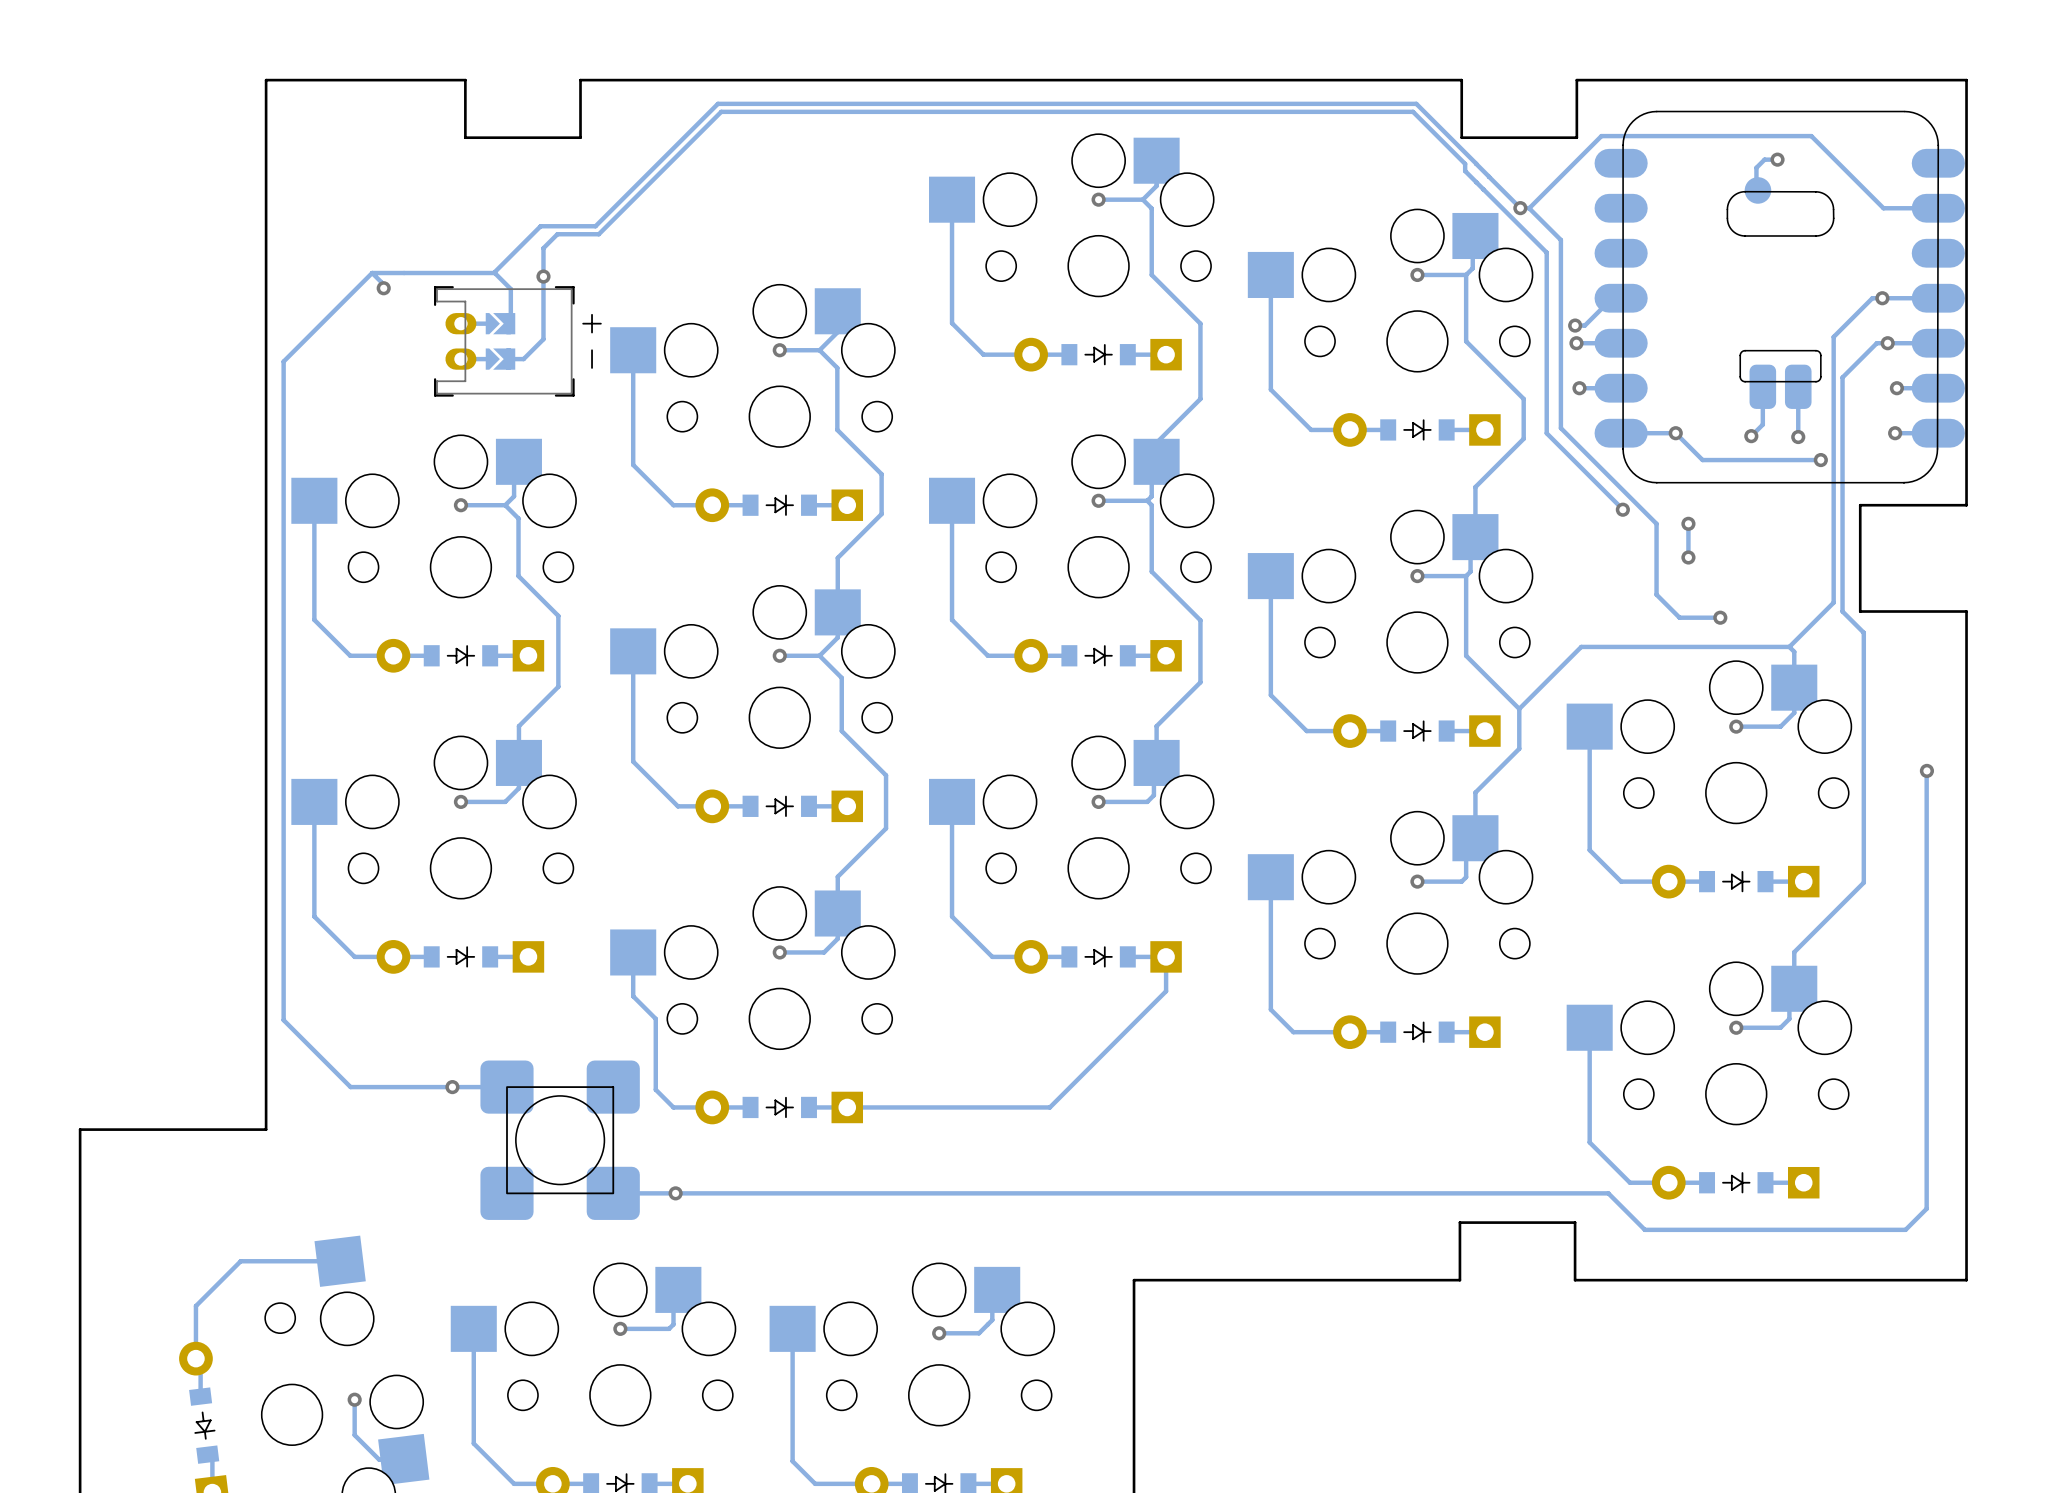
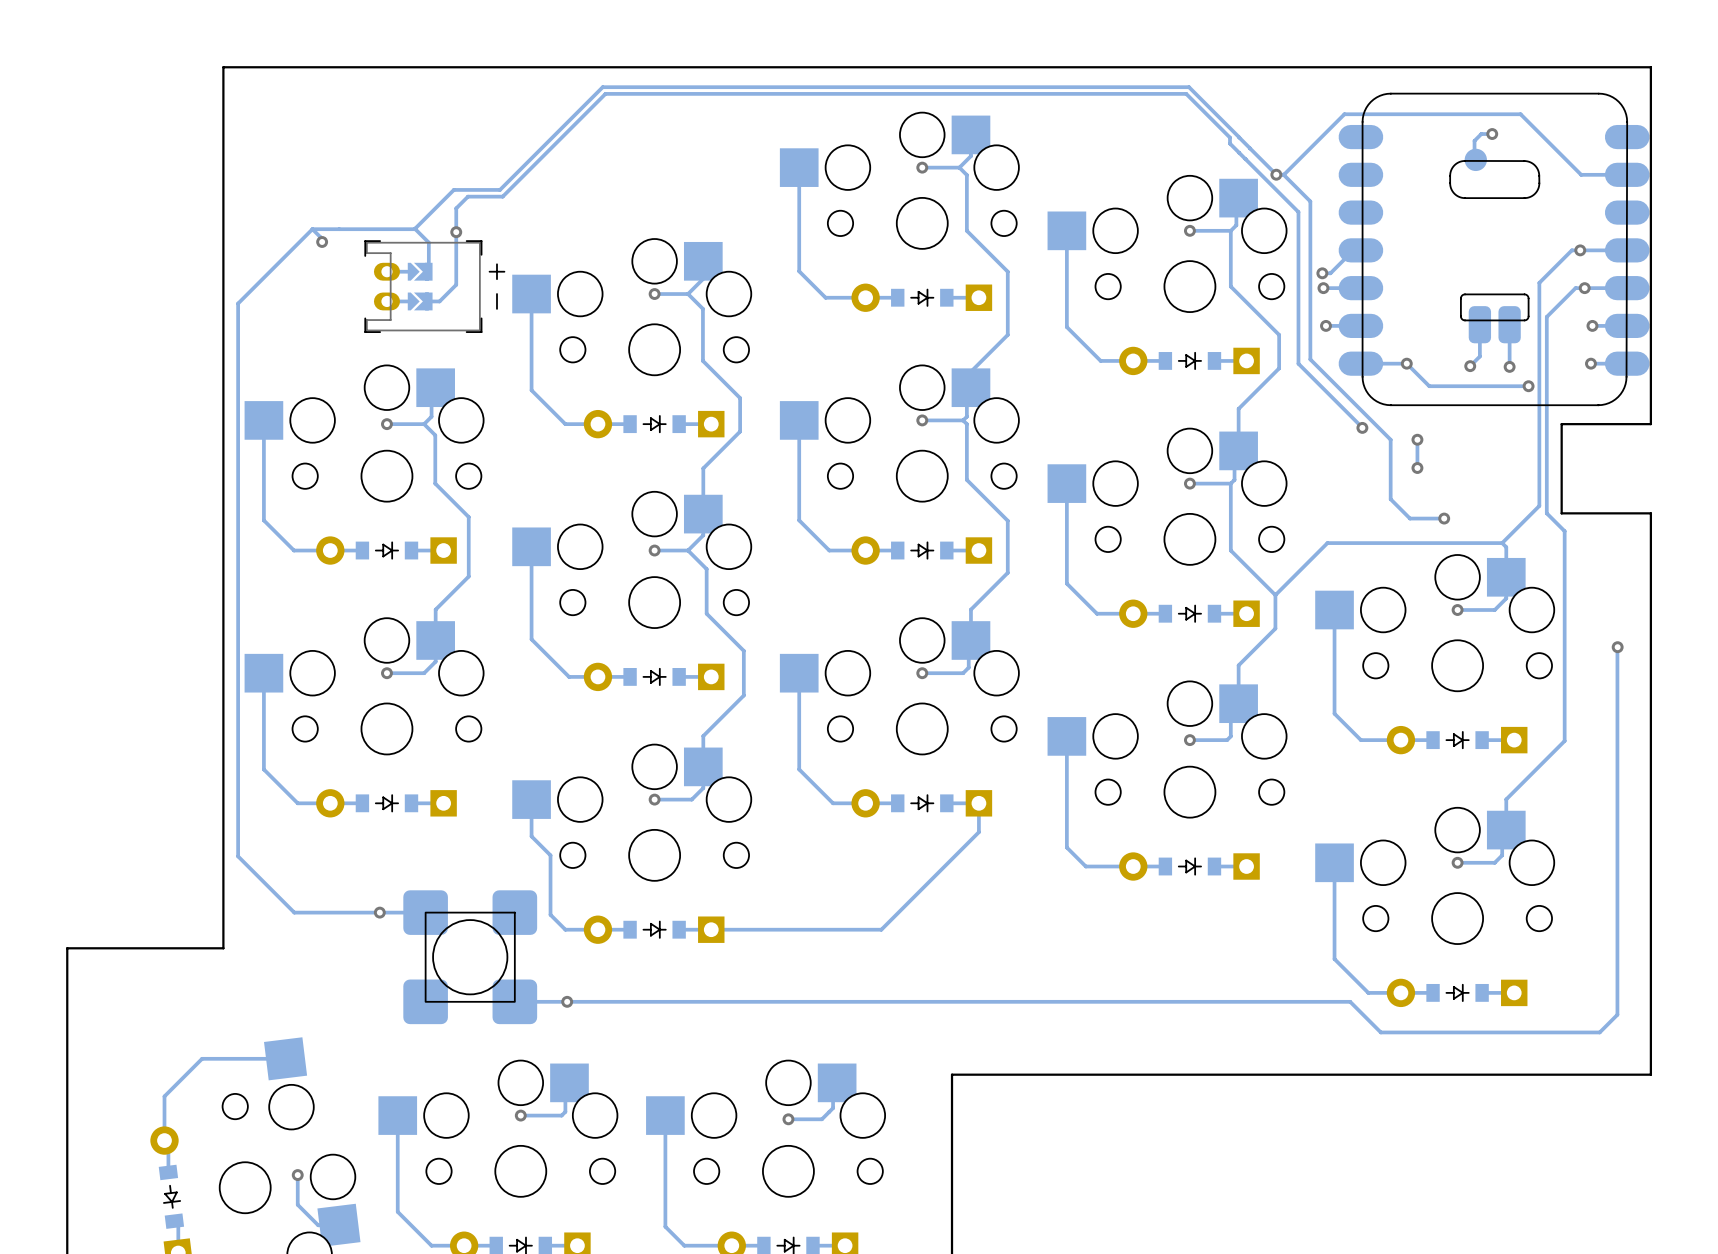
board edge: (580, 80) (580, 137) (465, 137) (465, 80) -> (487, 67) (390, 67)
board edge: (1576, 80) (1576, 137) (1461, 137) (1461, 80) -> (1323, 67) (1227, 67)
board edge: (1575, 1280) (1575, 1222) (1459, 1222) (1459, 1280) -> (1322, 1074) (1225, 1074)

